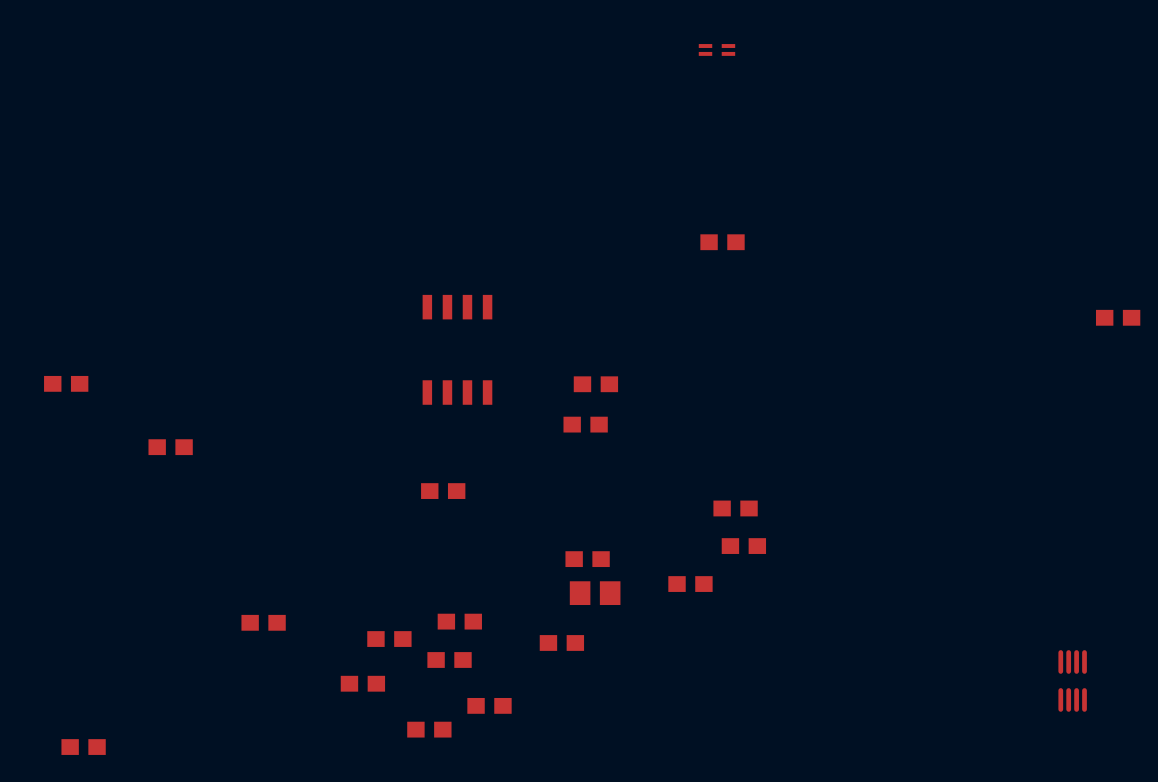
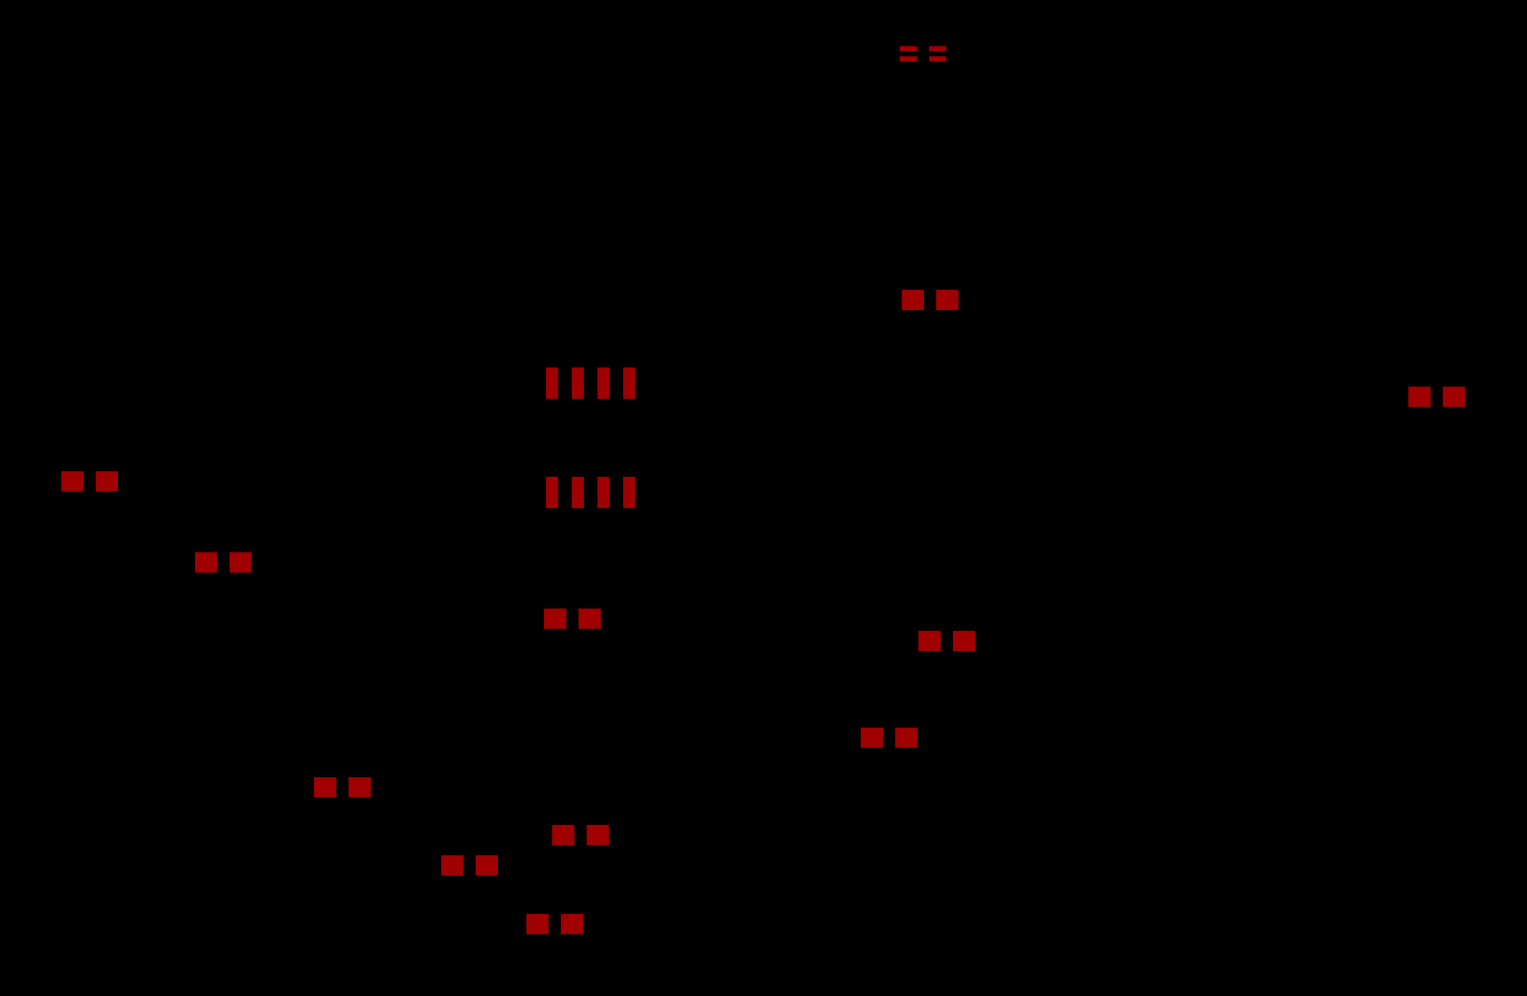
part: (595, 384) -> none
part: (585, 424) -> none
part: (743, 546) -> none
part: (587, 559) -> none
part: (595, 593) -> none
part: (459, 621) -> none
part: (389, 639) -> none
part: (561, 642) -> none
part: (1072, 680) -> none
part: (489, 705) -> none
part: (83, 747) -> none

